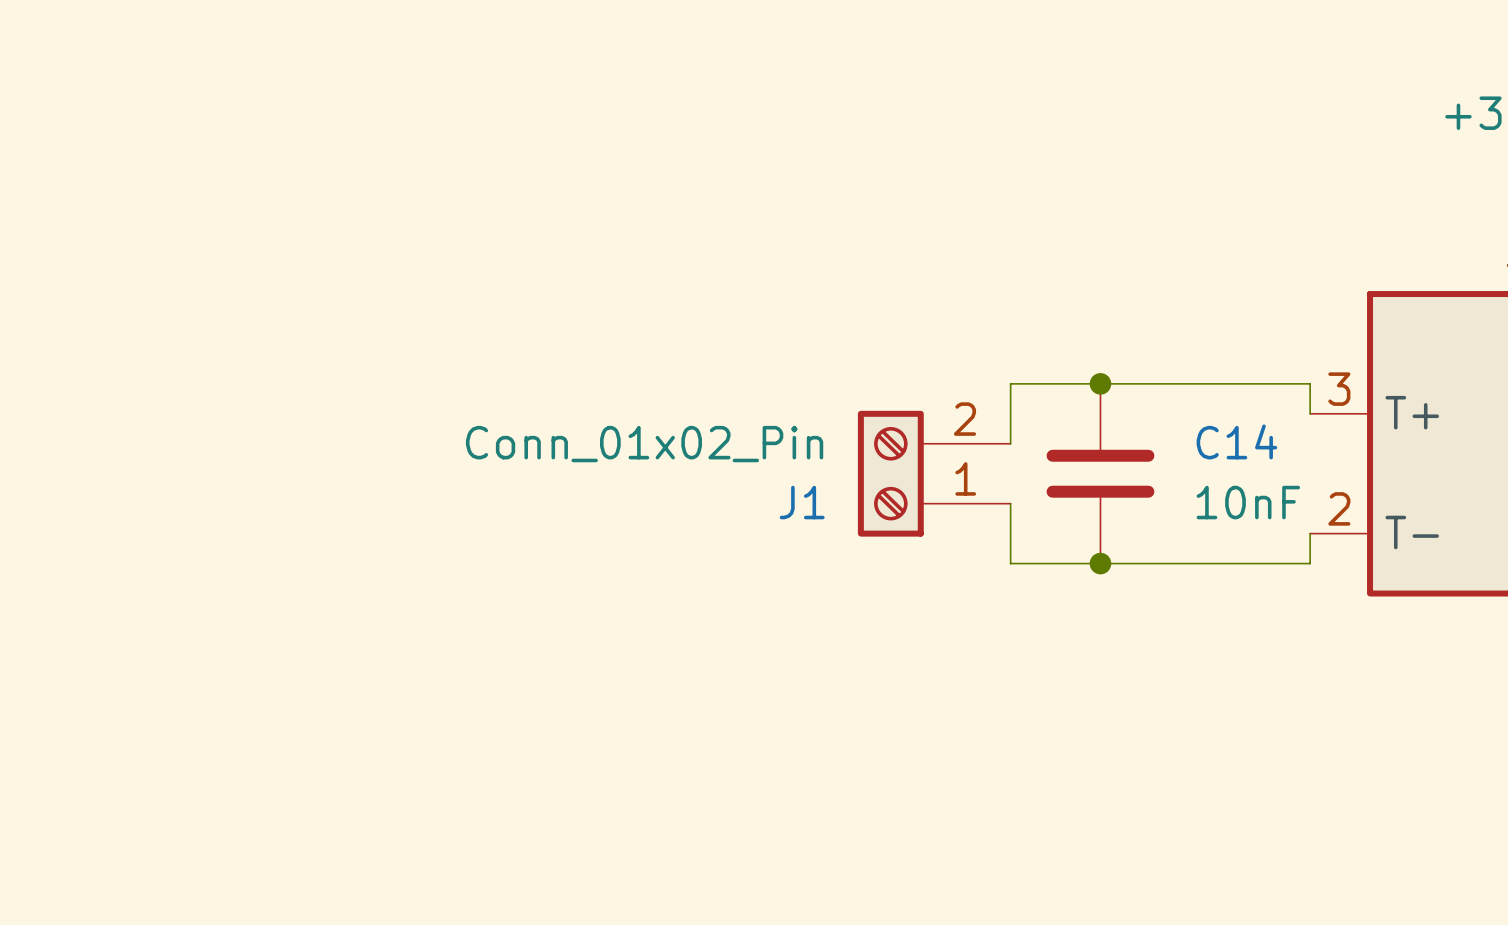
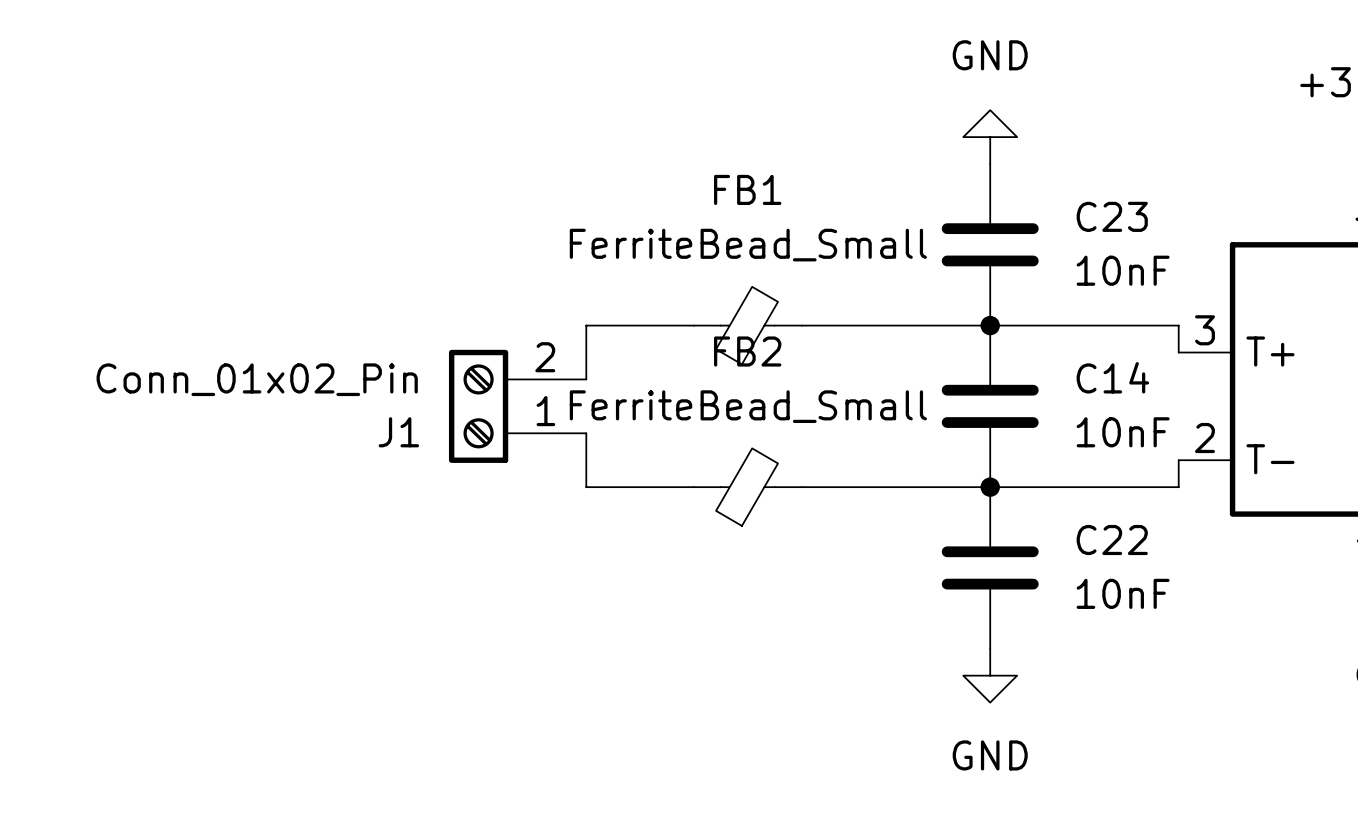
power symbol: none -> GND (990, 137)
C23: none -> 10nF (990, 244)
wire: none -> (694, 325) (586, 325) (586, 379)
FB1: none -> FerriteBead_Small (747, 325)
wire: (1010, 383) (1010, 443) -> (909, 325) (801, 325)
J1 position: (934, 473) -> (517, 406)
wire: none -> (586, 433) (586, 487) (694, 487)
wire: (1010, 503) (1010, 563) -> (801, 487) (909, 487)
FB2: none -> FerriteBead_Small (747, 487)
C22: none -> 10nF (990, 567)
power symbol: none -> GND (990, 675)

